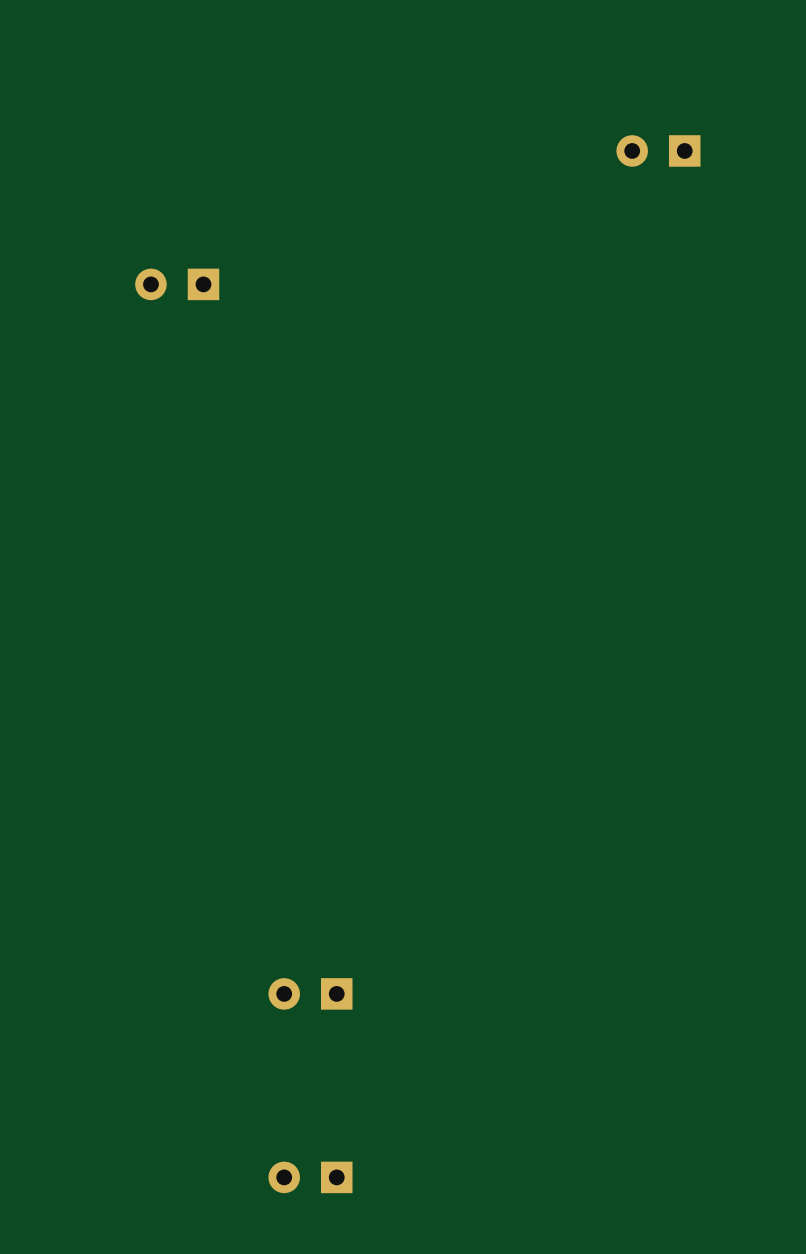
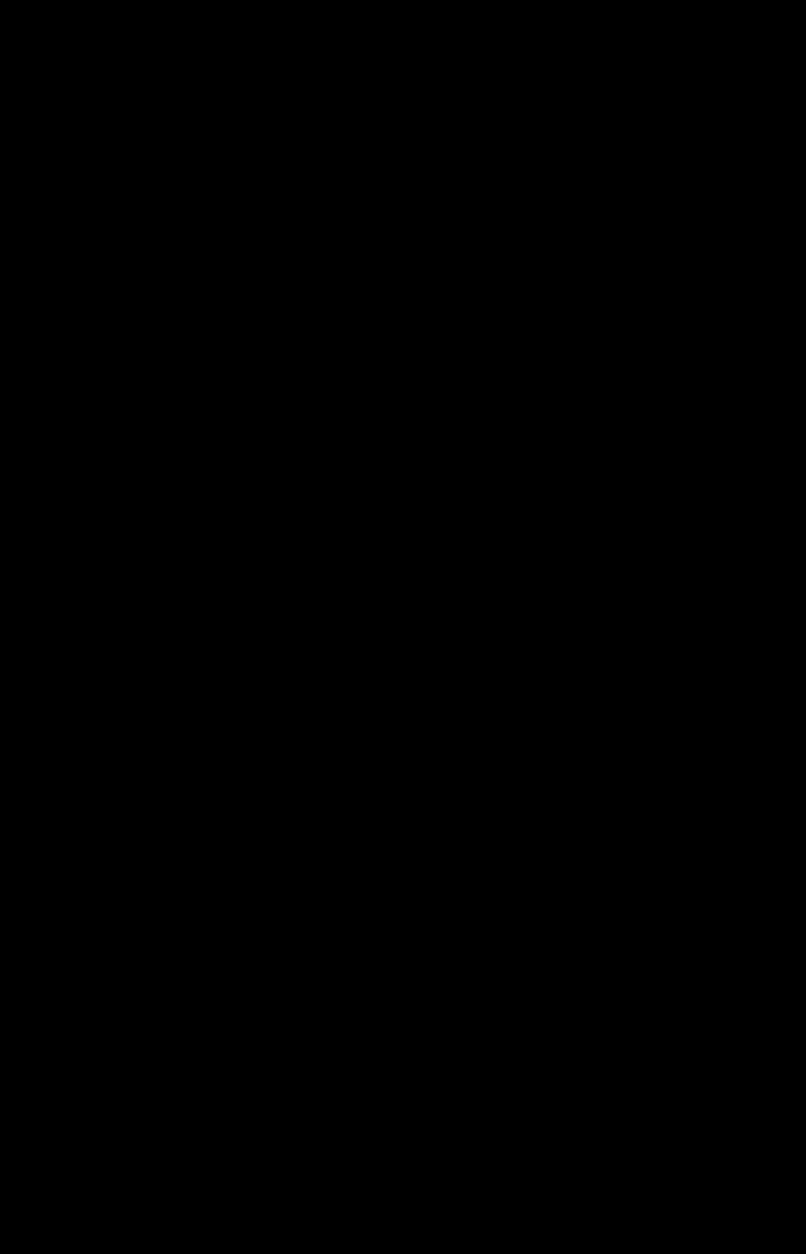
part: (658, 150) -> none
part: (177, 284) -> none
part: (310, 993) -> none
part: (310, 1177) -> none

